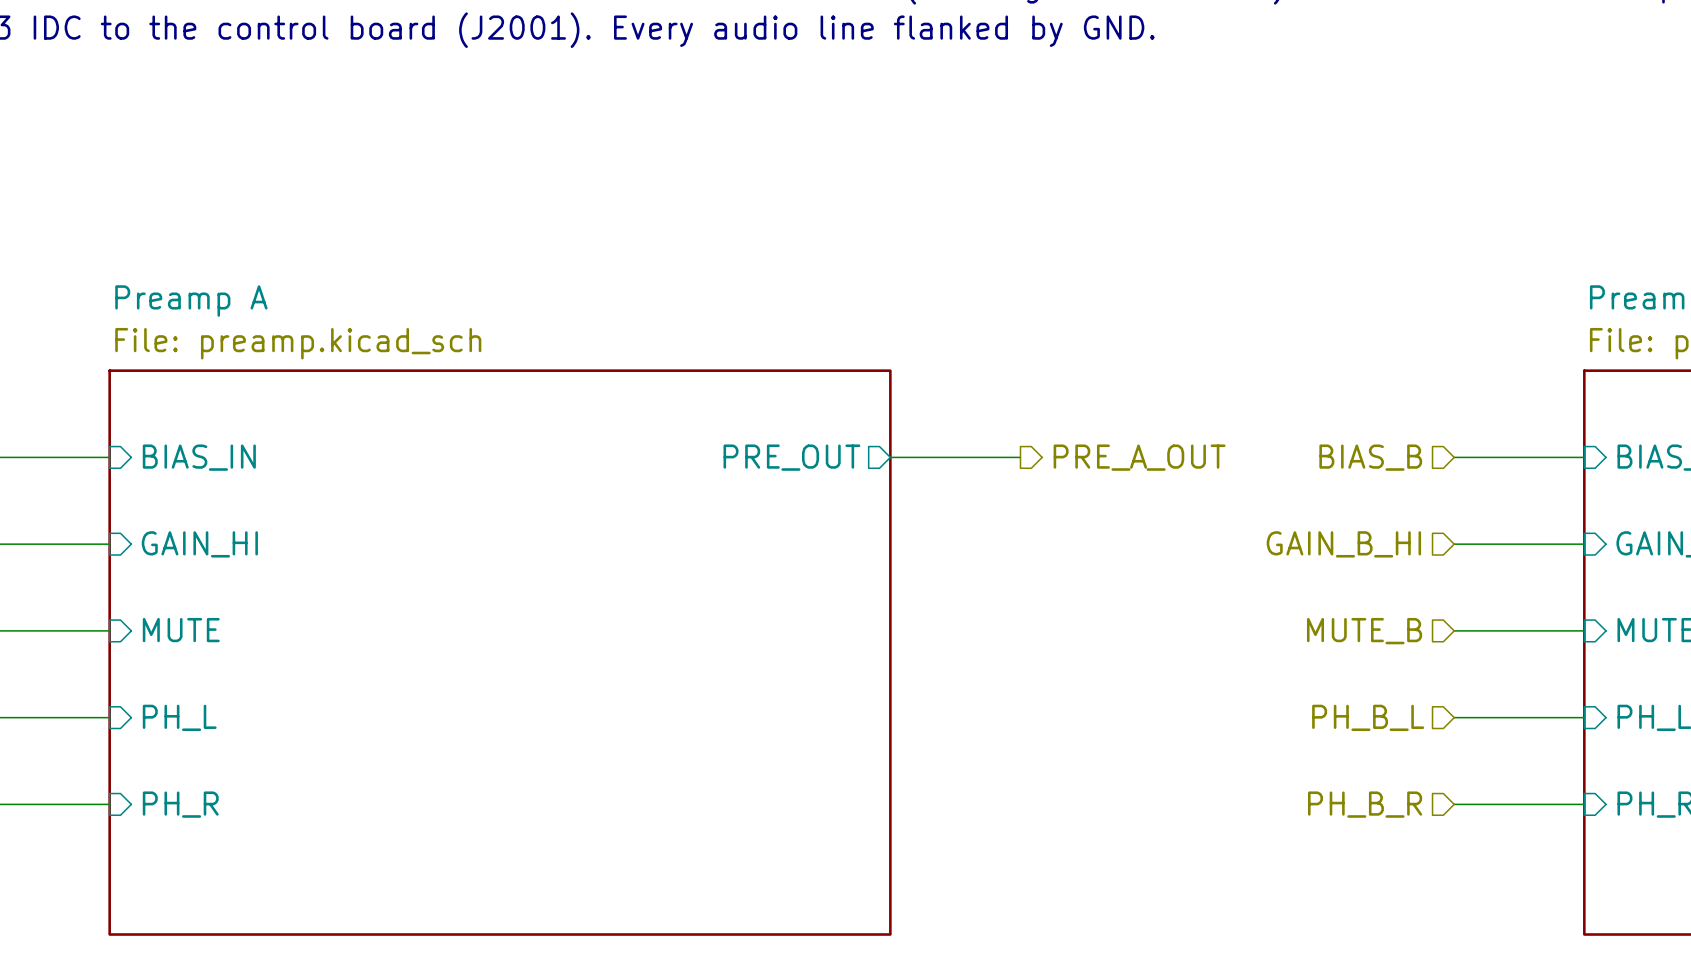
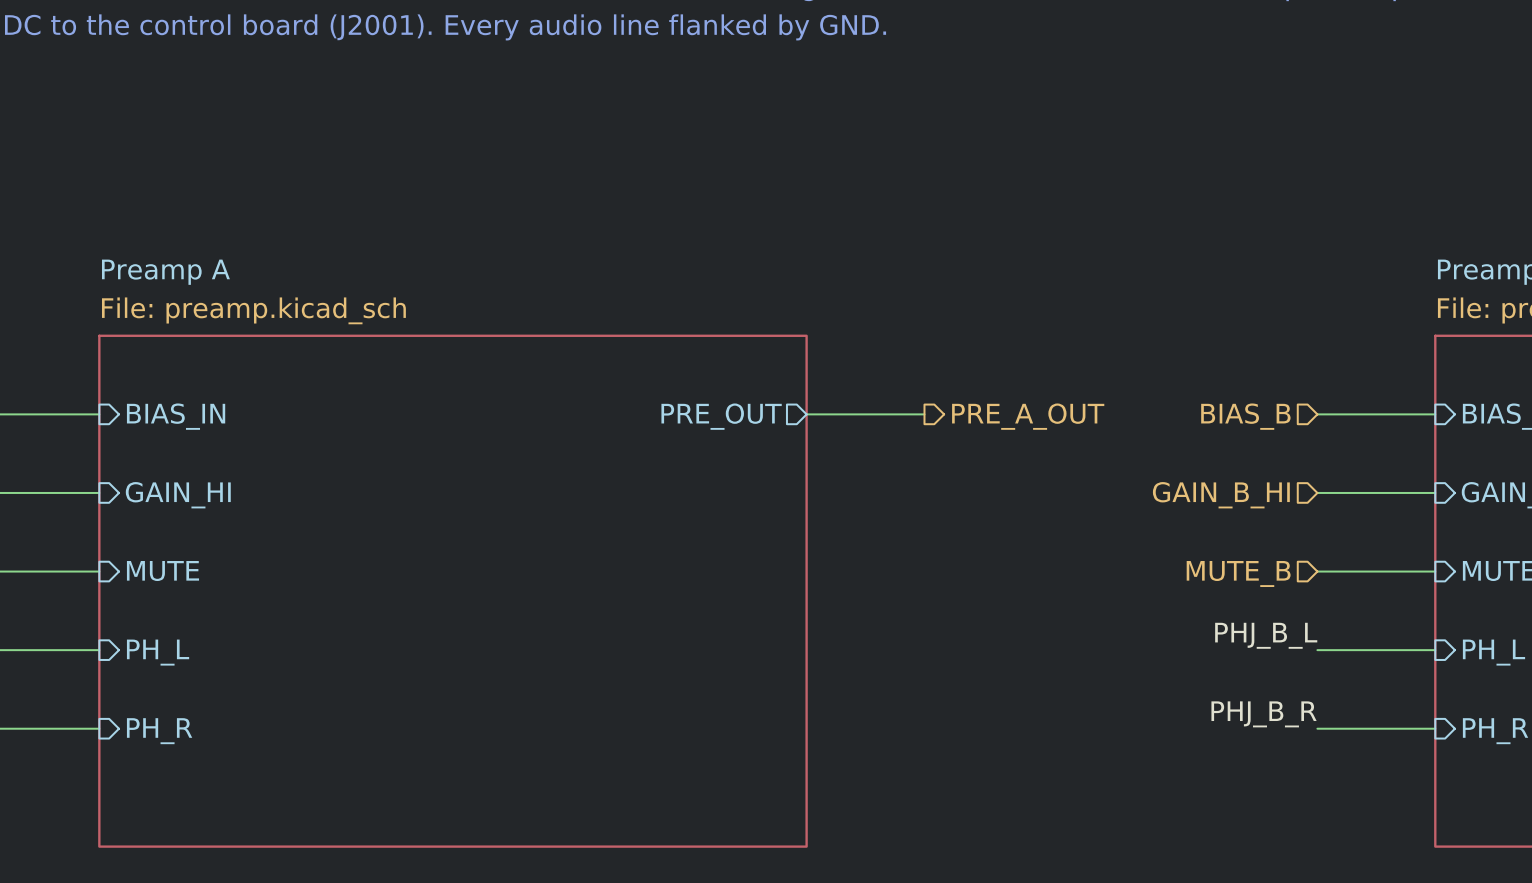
label: none -> PHJ_B_L (1266, 635)
hierarchical label: PH_B_L (1368, 717) -> none
label: none -> PHJ_B_R (1264, 714)
hierarchical label: PH_B_R (1365, 804) -> none

